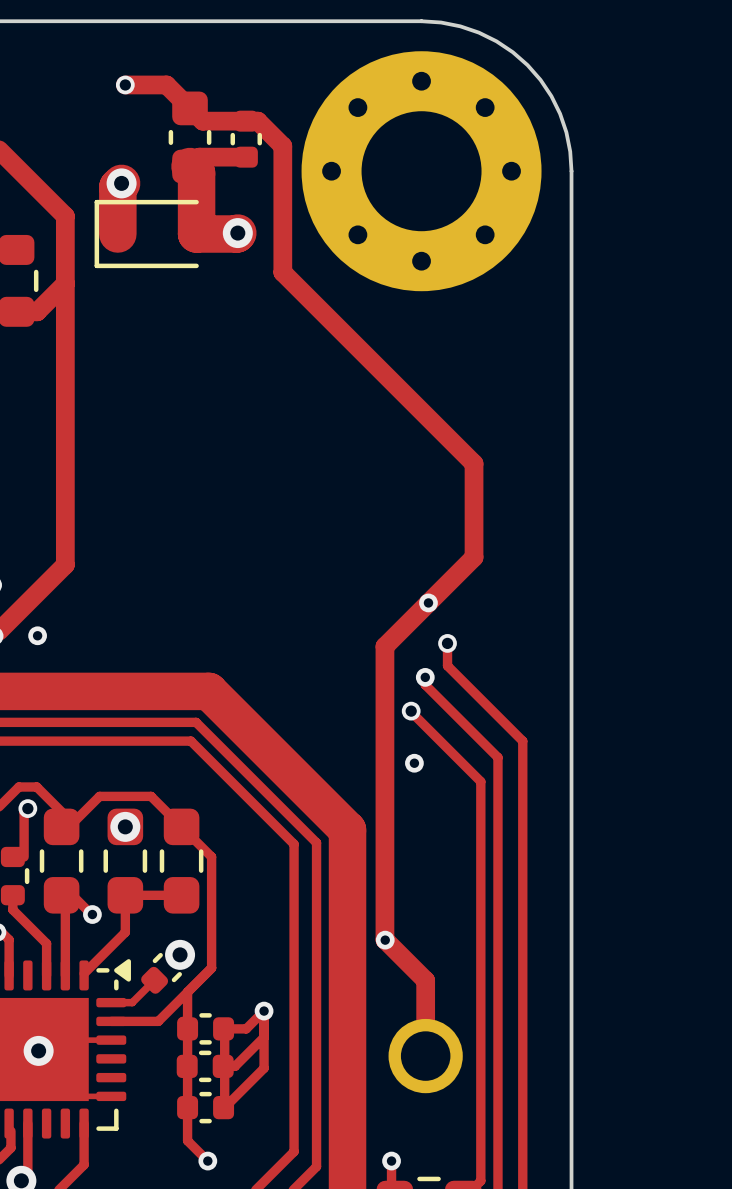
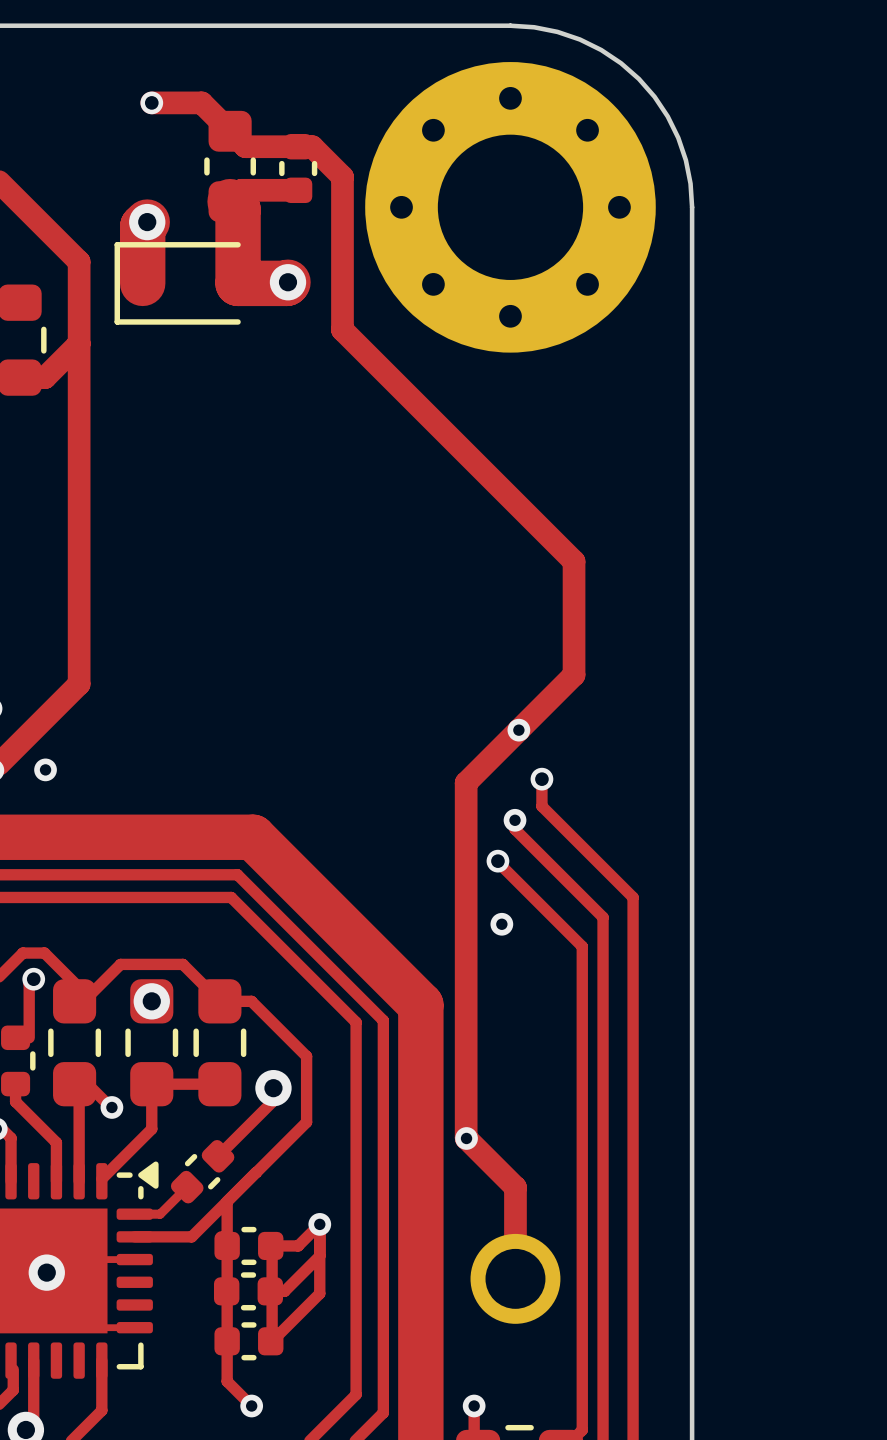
track: (181, 826) (211, 856) (211, 968) -> (219, 1001) (251, 1001) (306, 1056) (306, 1122) (256, 1172)
track: none -> (273, 1088) (273, 1100) (218, 1156)
via position: (180, 954) -> (273, 1088)

